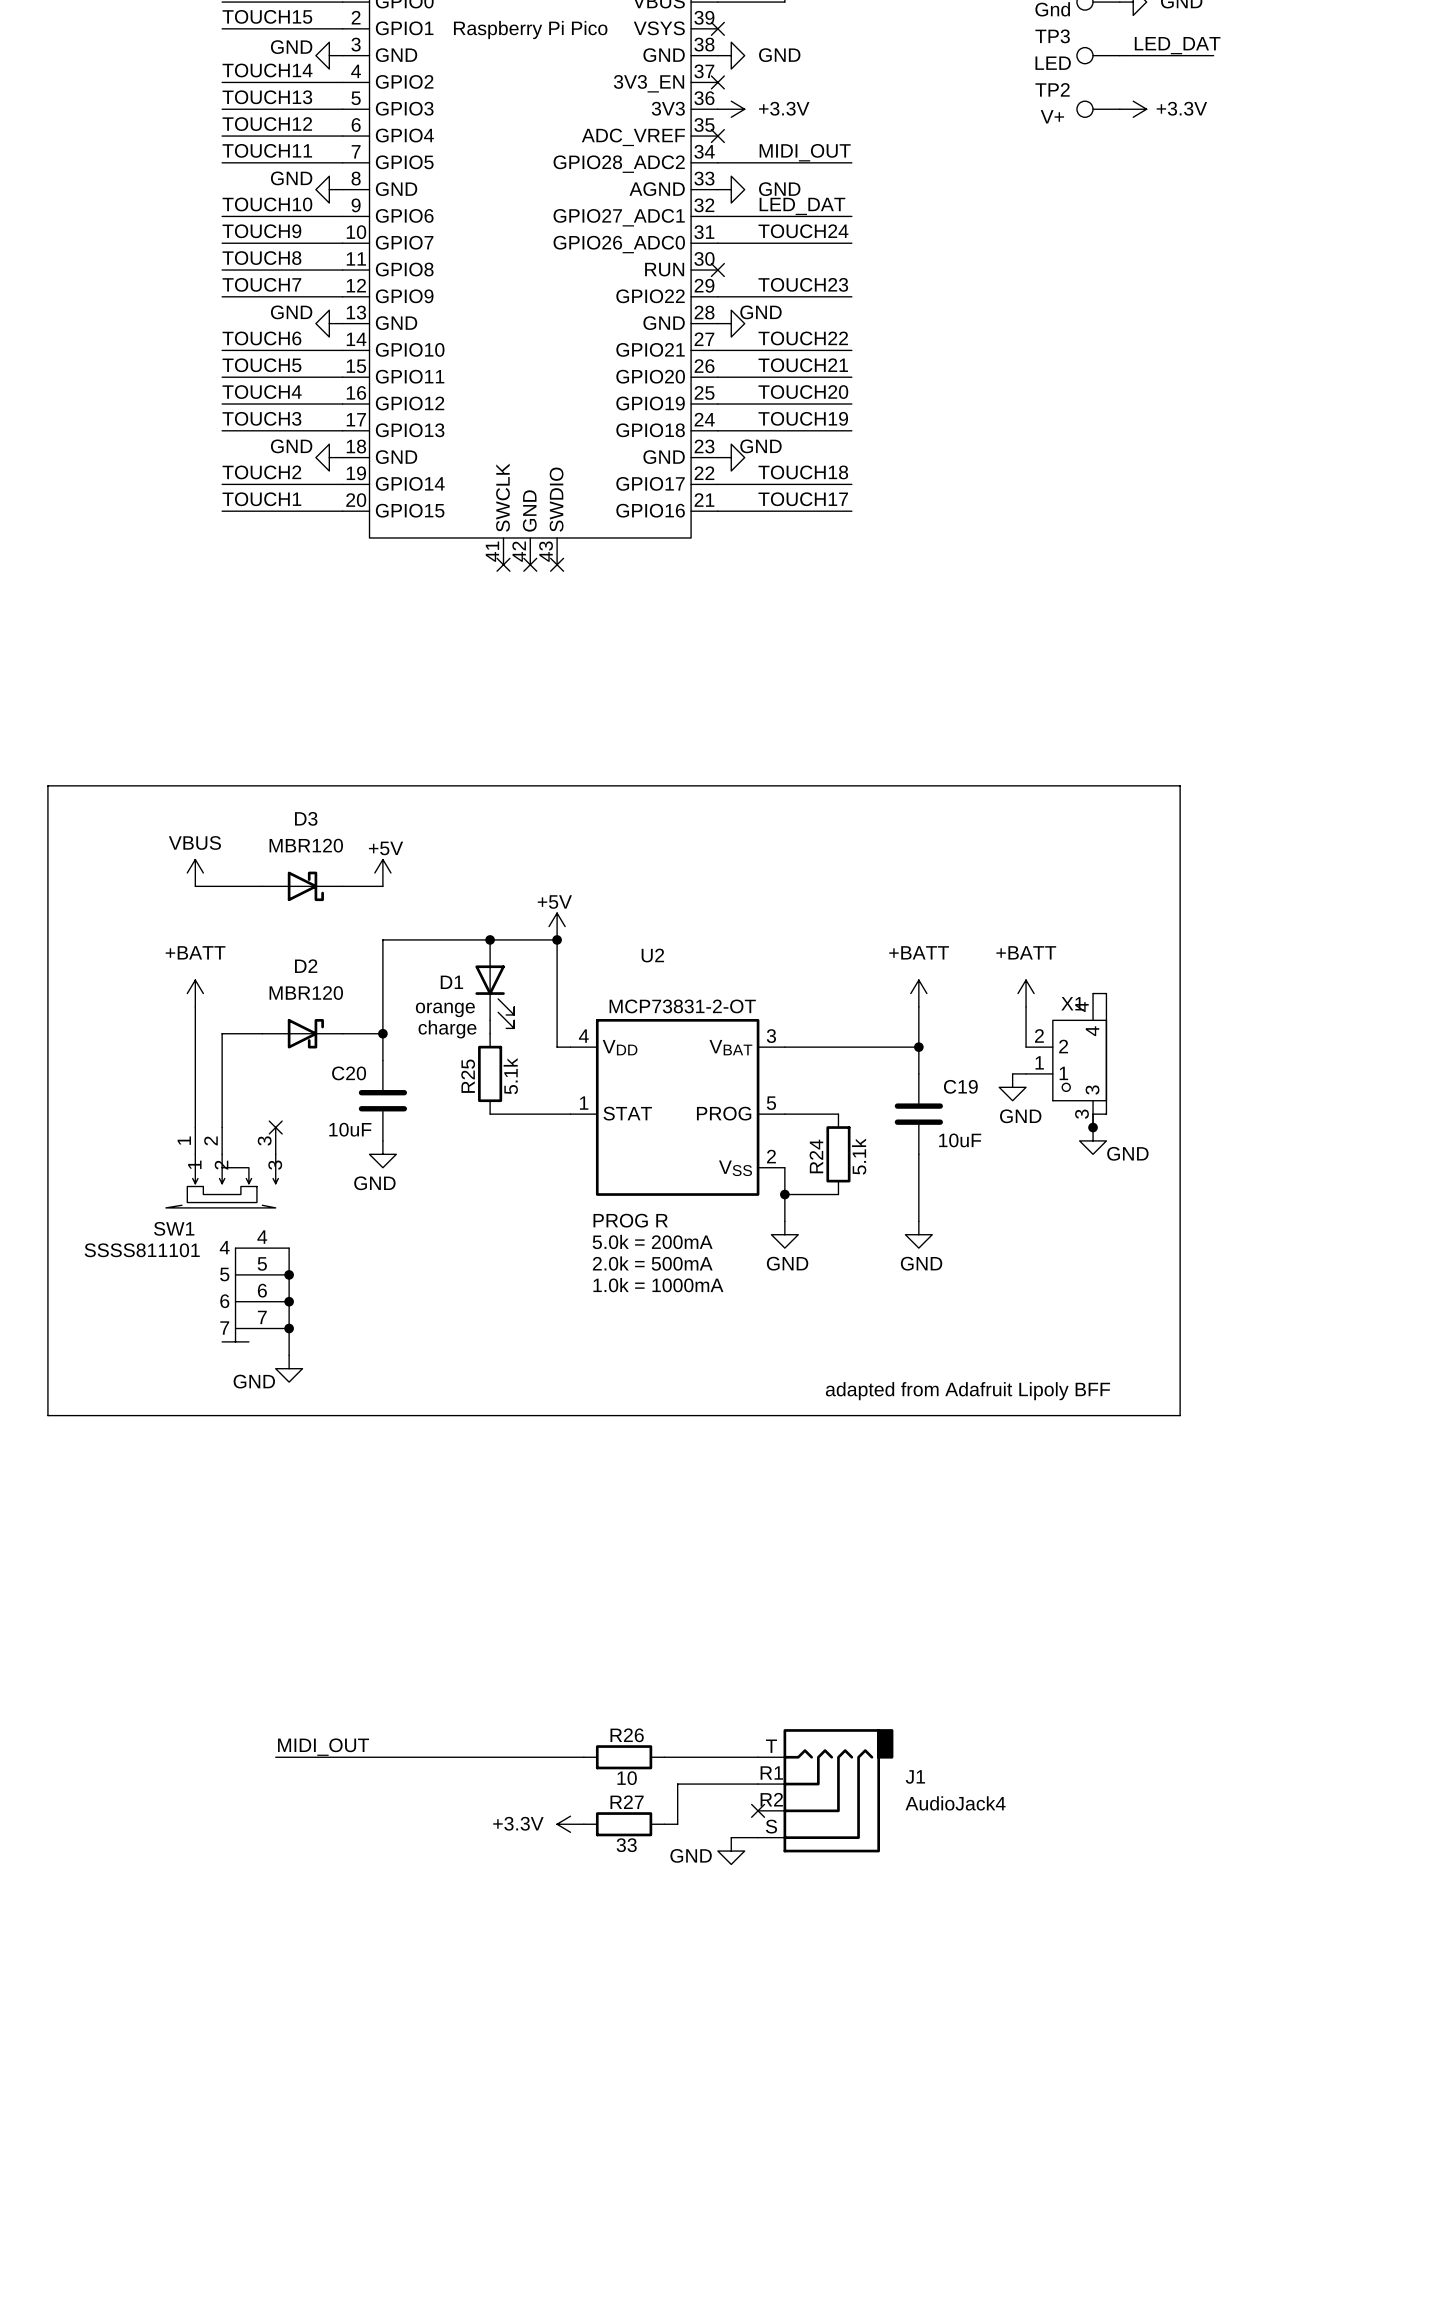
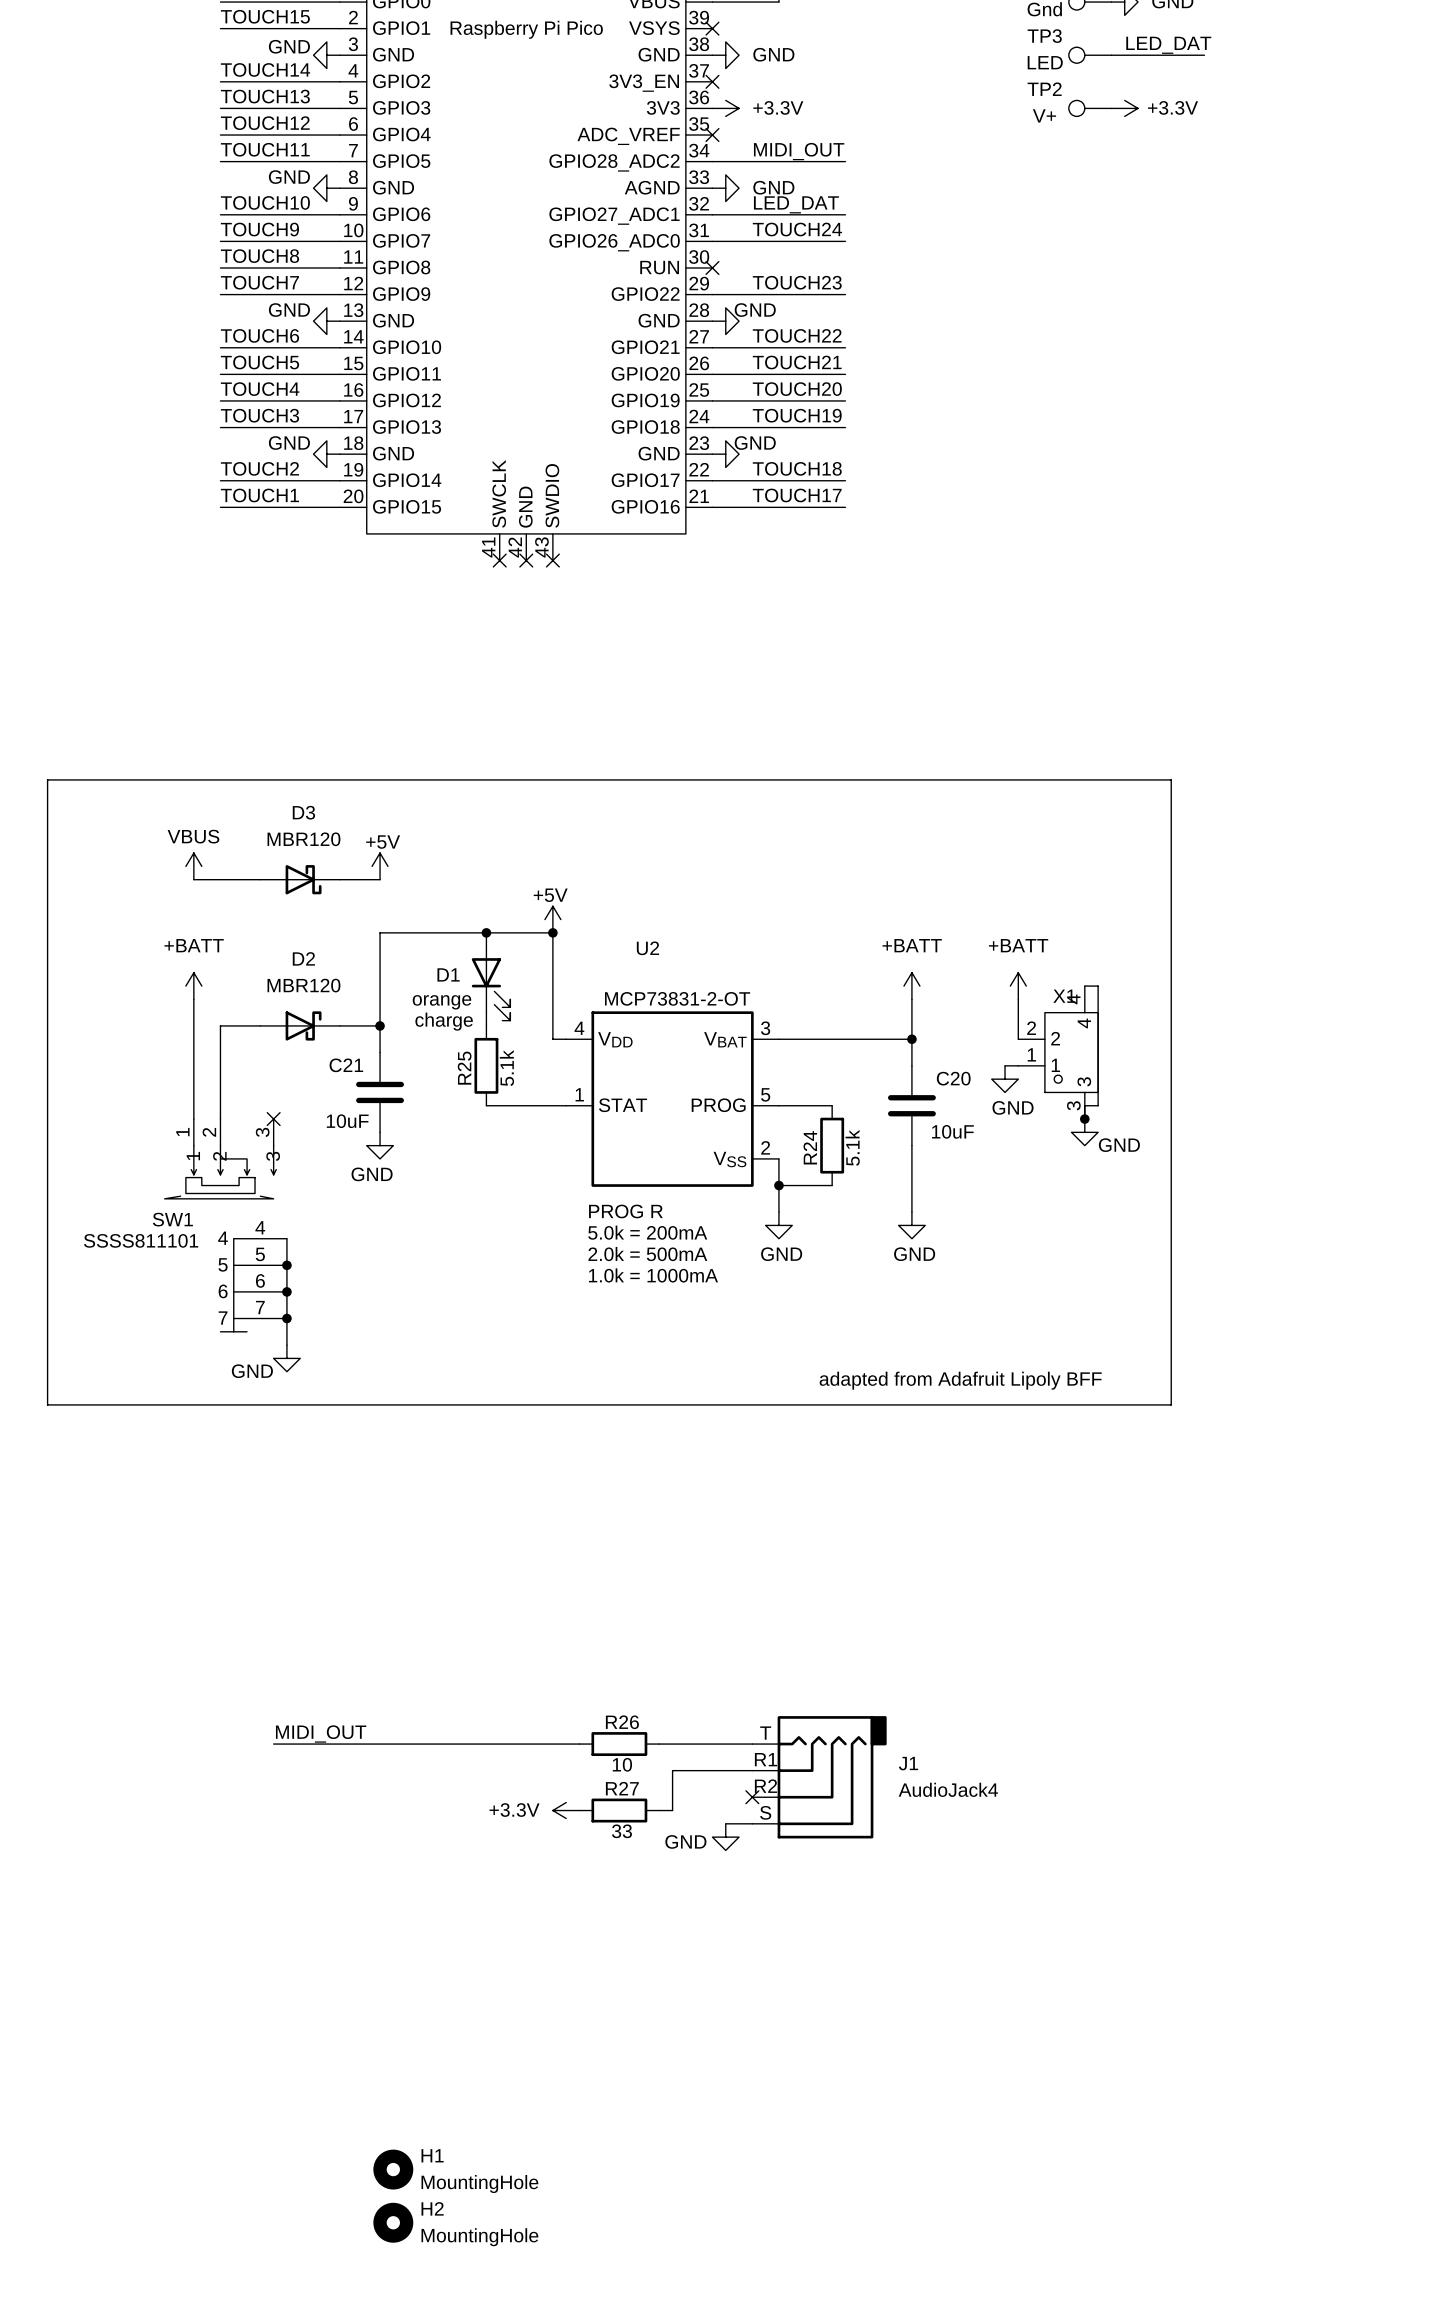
C20 name: C20 (349, 1073) -> C21 (346, 1065)
C19 name: C19 (960, 1086) -> C20 (953, 1078)
H1: none -> MountingHole (393, 2169)
H2: none -> MountingHole (393, 2222)

